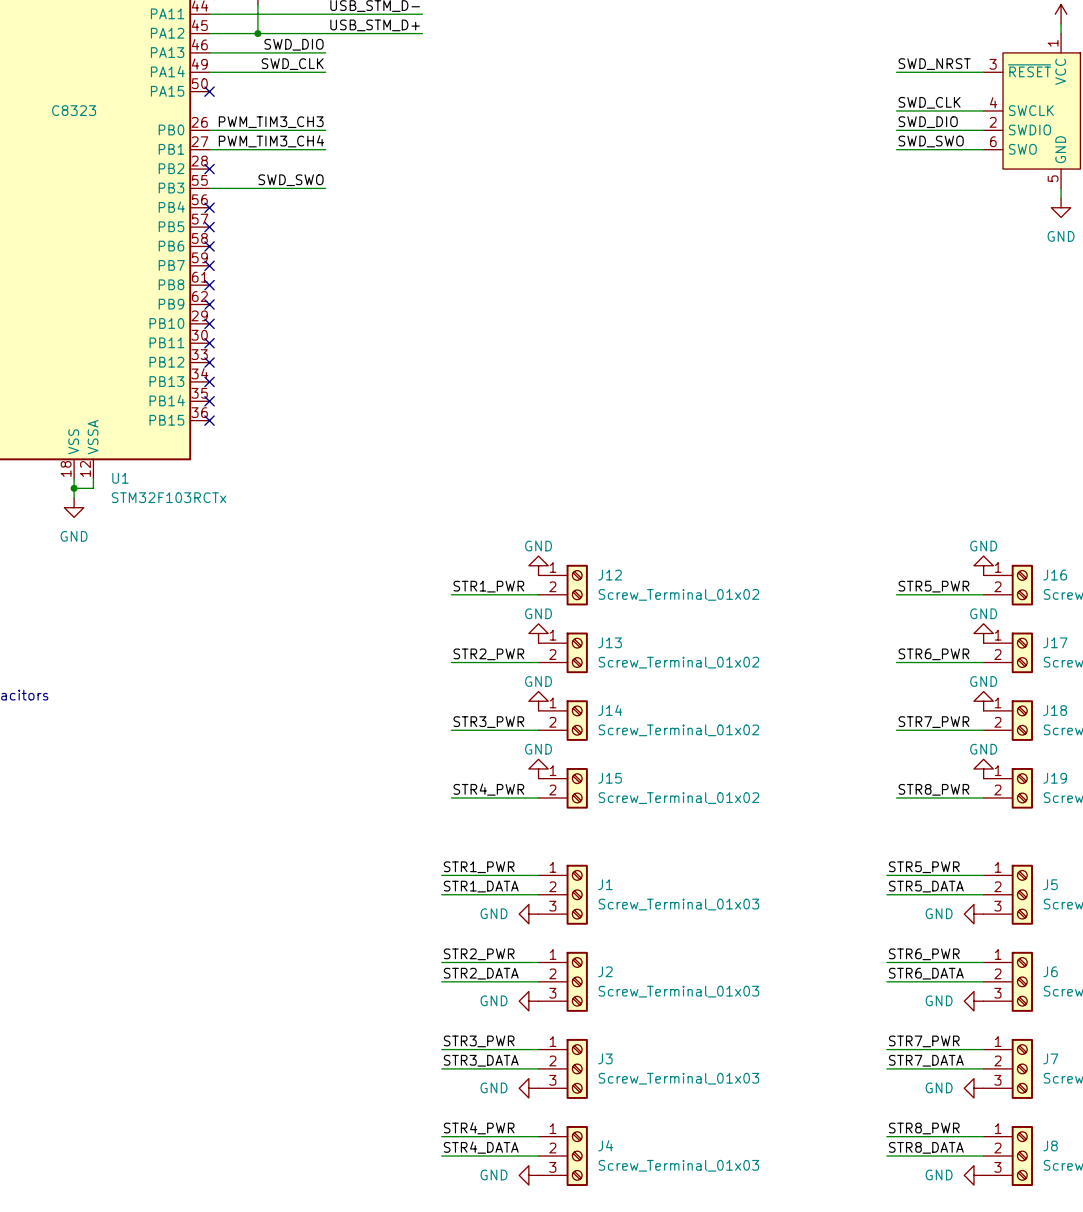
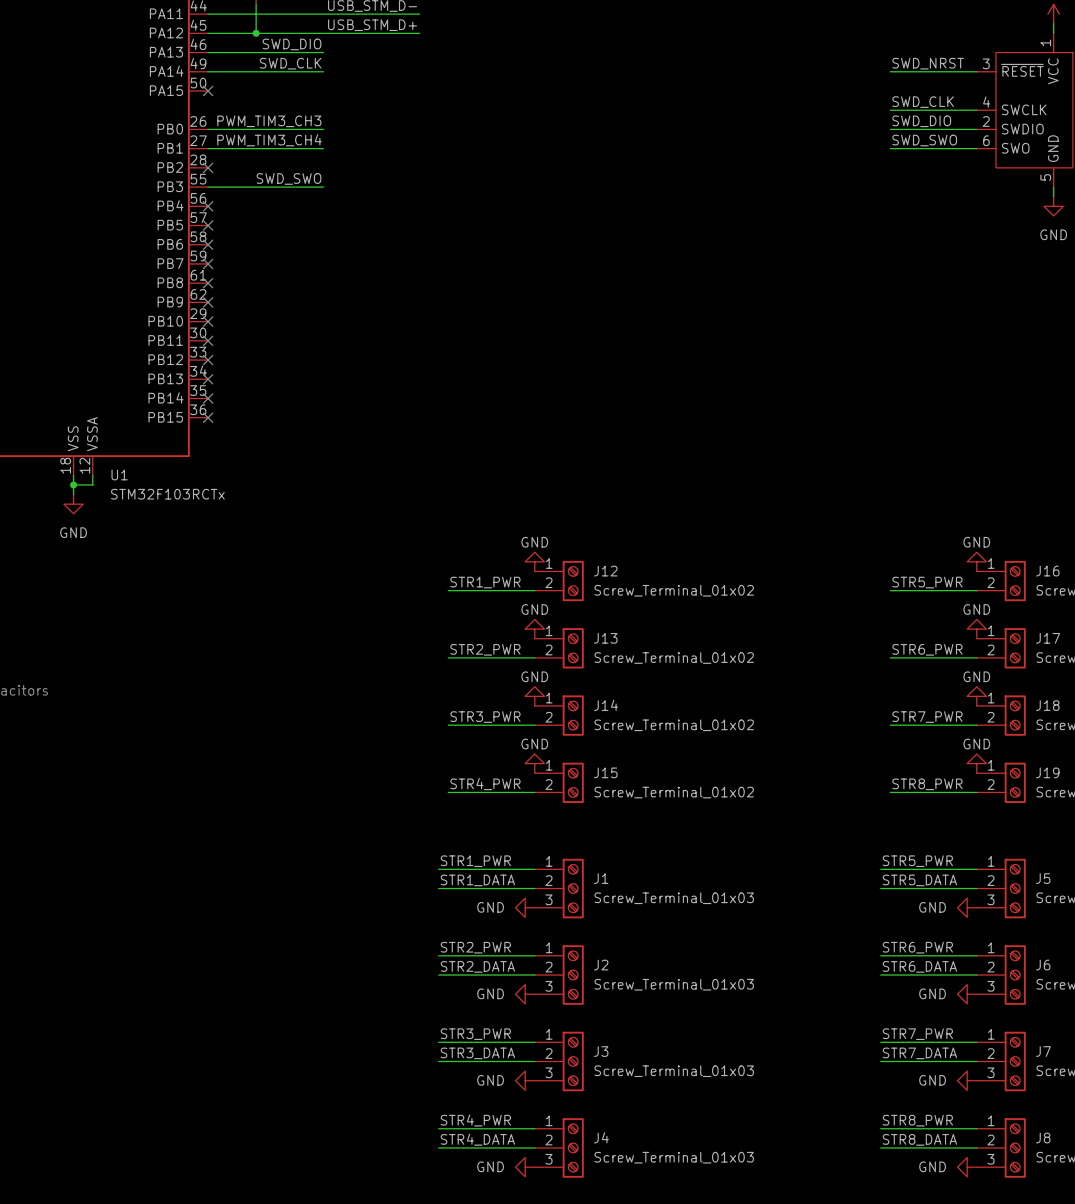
U1 text: C8323 (74, 110) -> none

